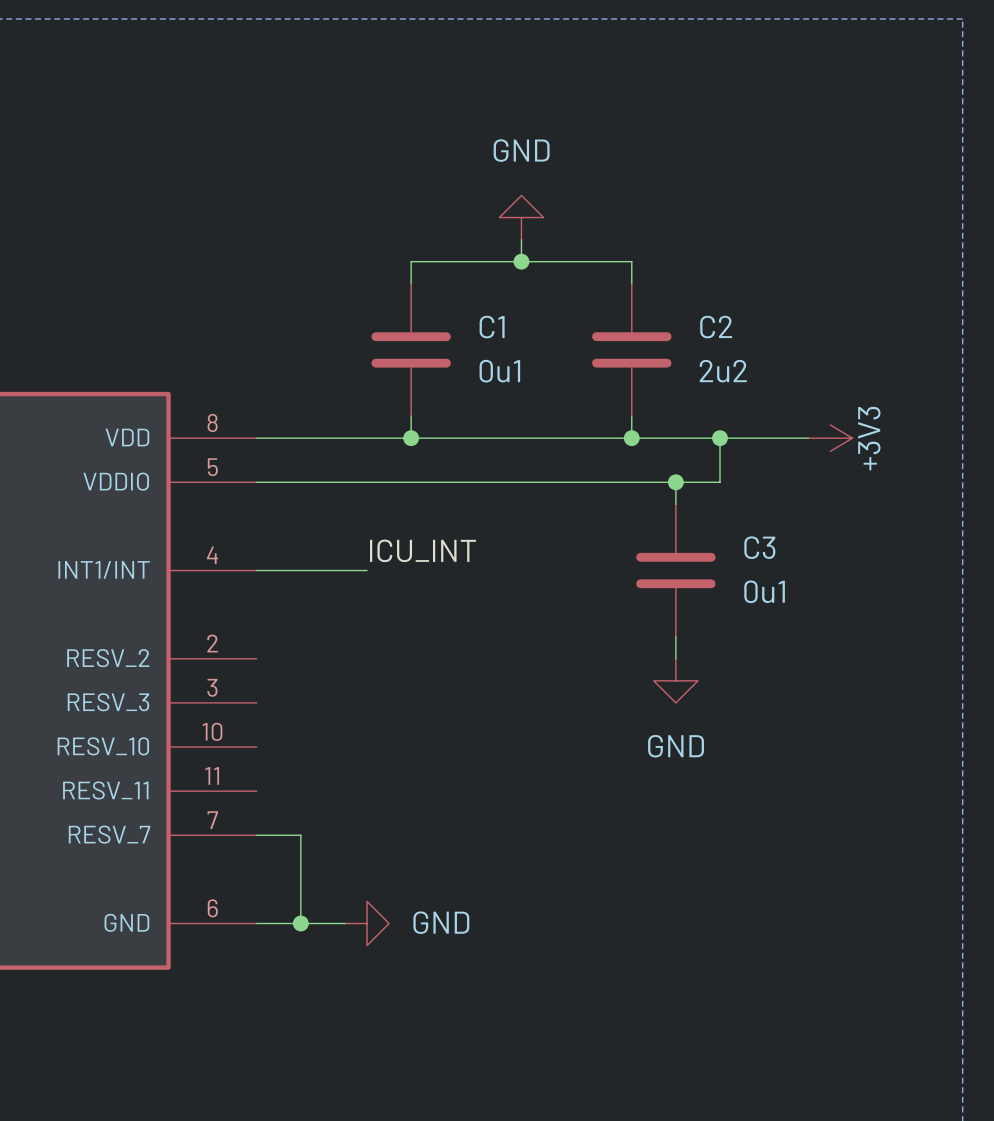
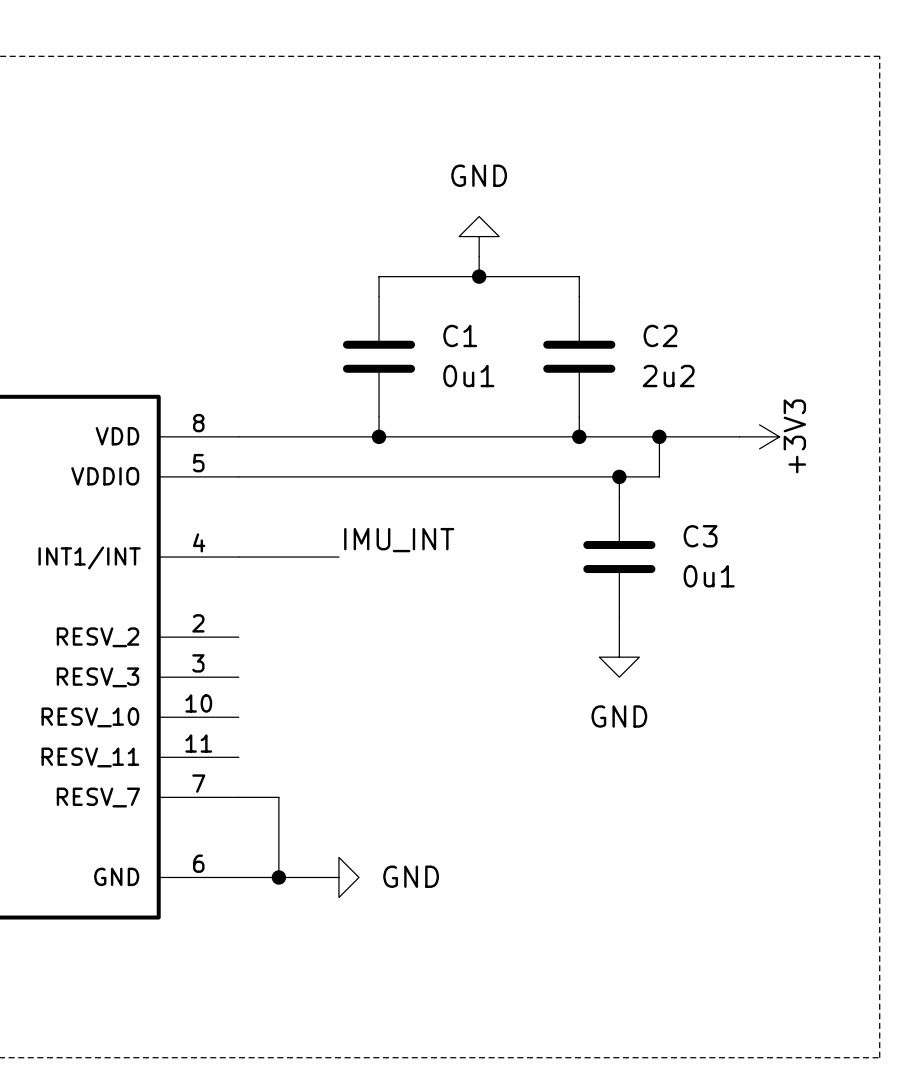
label: ICU_INT (423, 550) -> IMU_INT (399, 540)

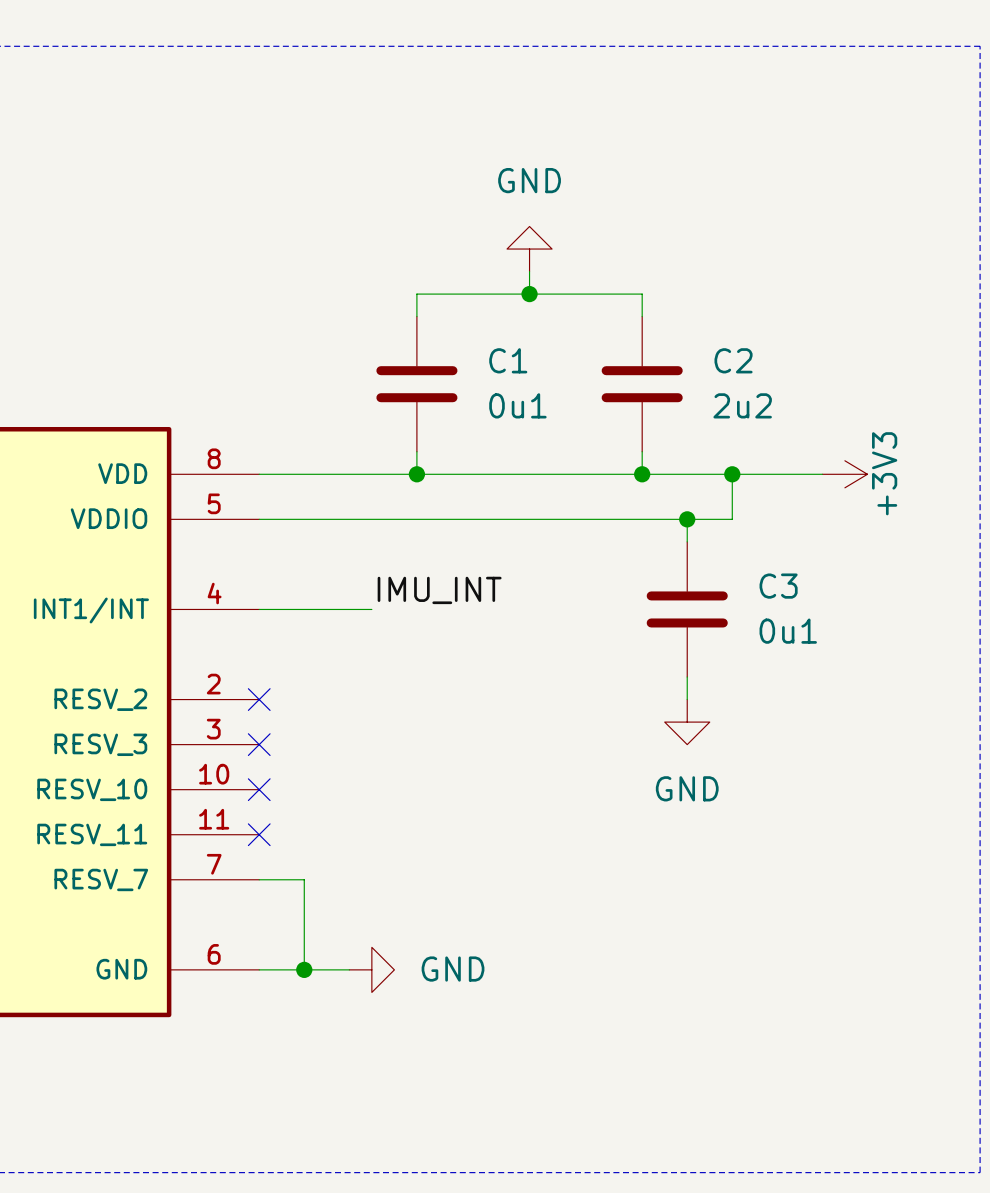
no-connect mark: none -> (259, 699)
no-connect mark: none -> (259, 744)
no-connect mark: none -> (259, 789)
no-connect mark: none -> (259, 834)

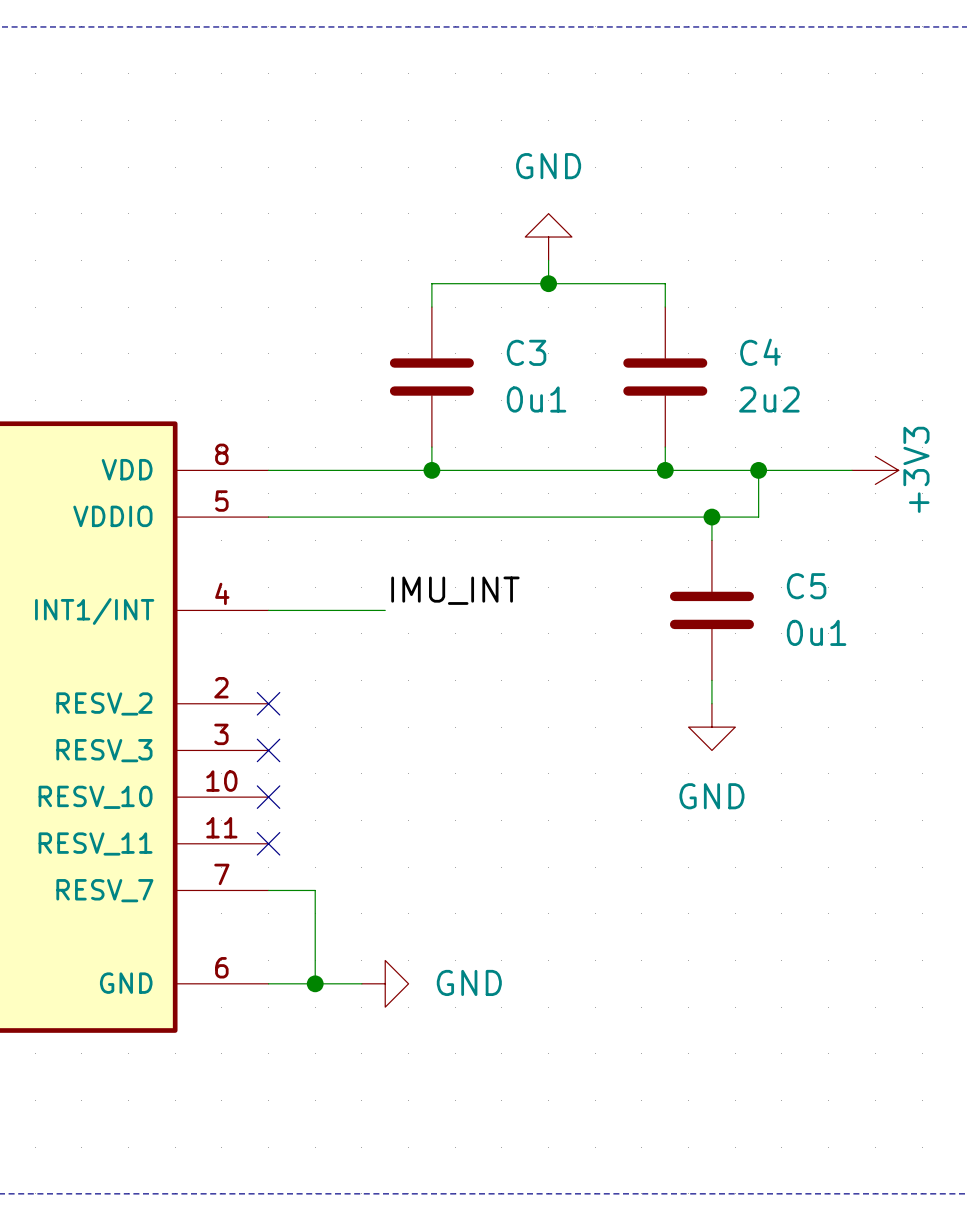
C1 name: C1 (508, 360) -> C3 (526, 352)
C2 name: C2 (733, 360) -> C4 (760, 352)
C3 name: C3 (778, 586) -> C5 (806, 586)

